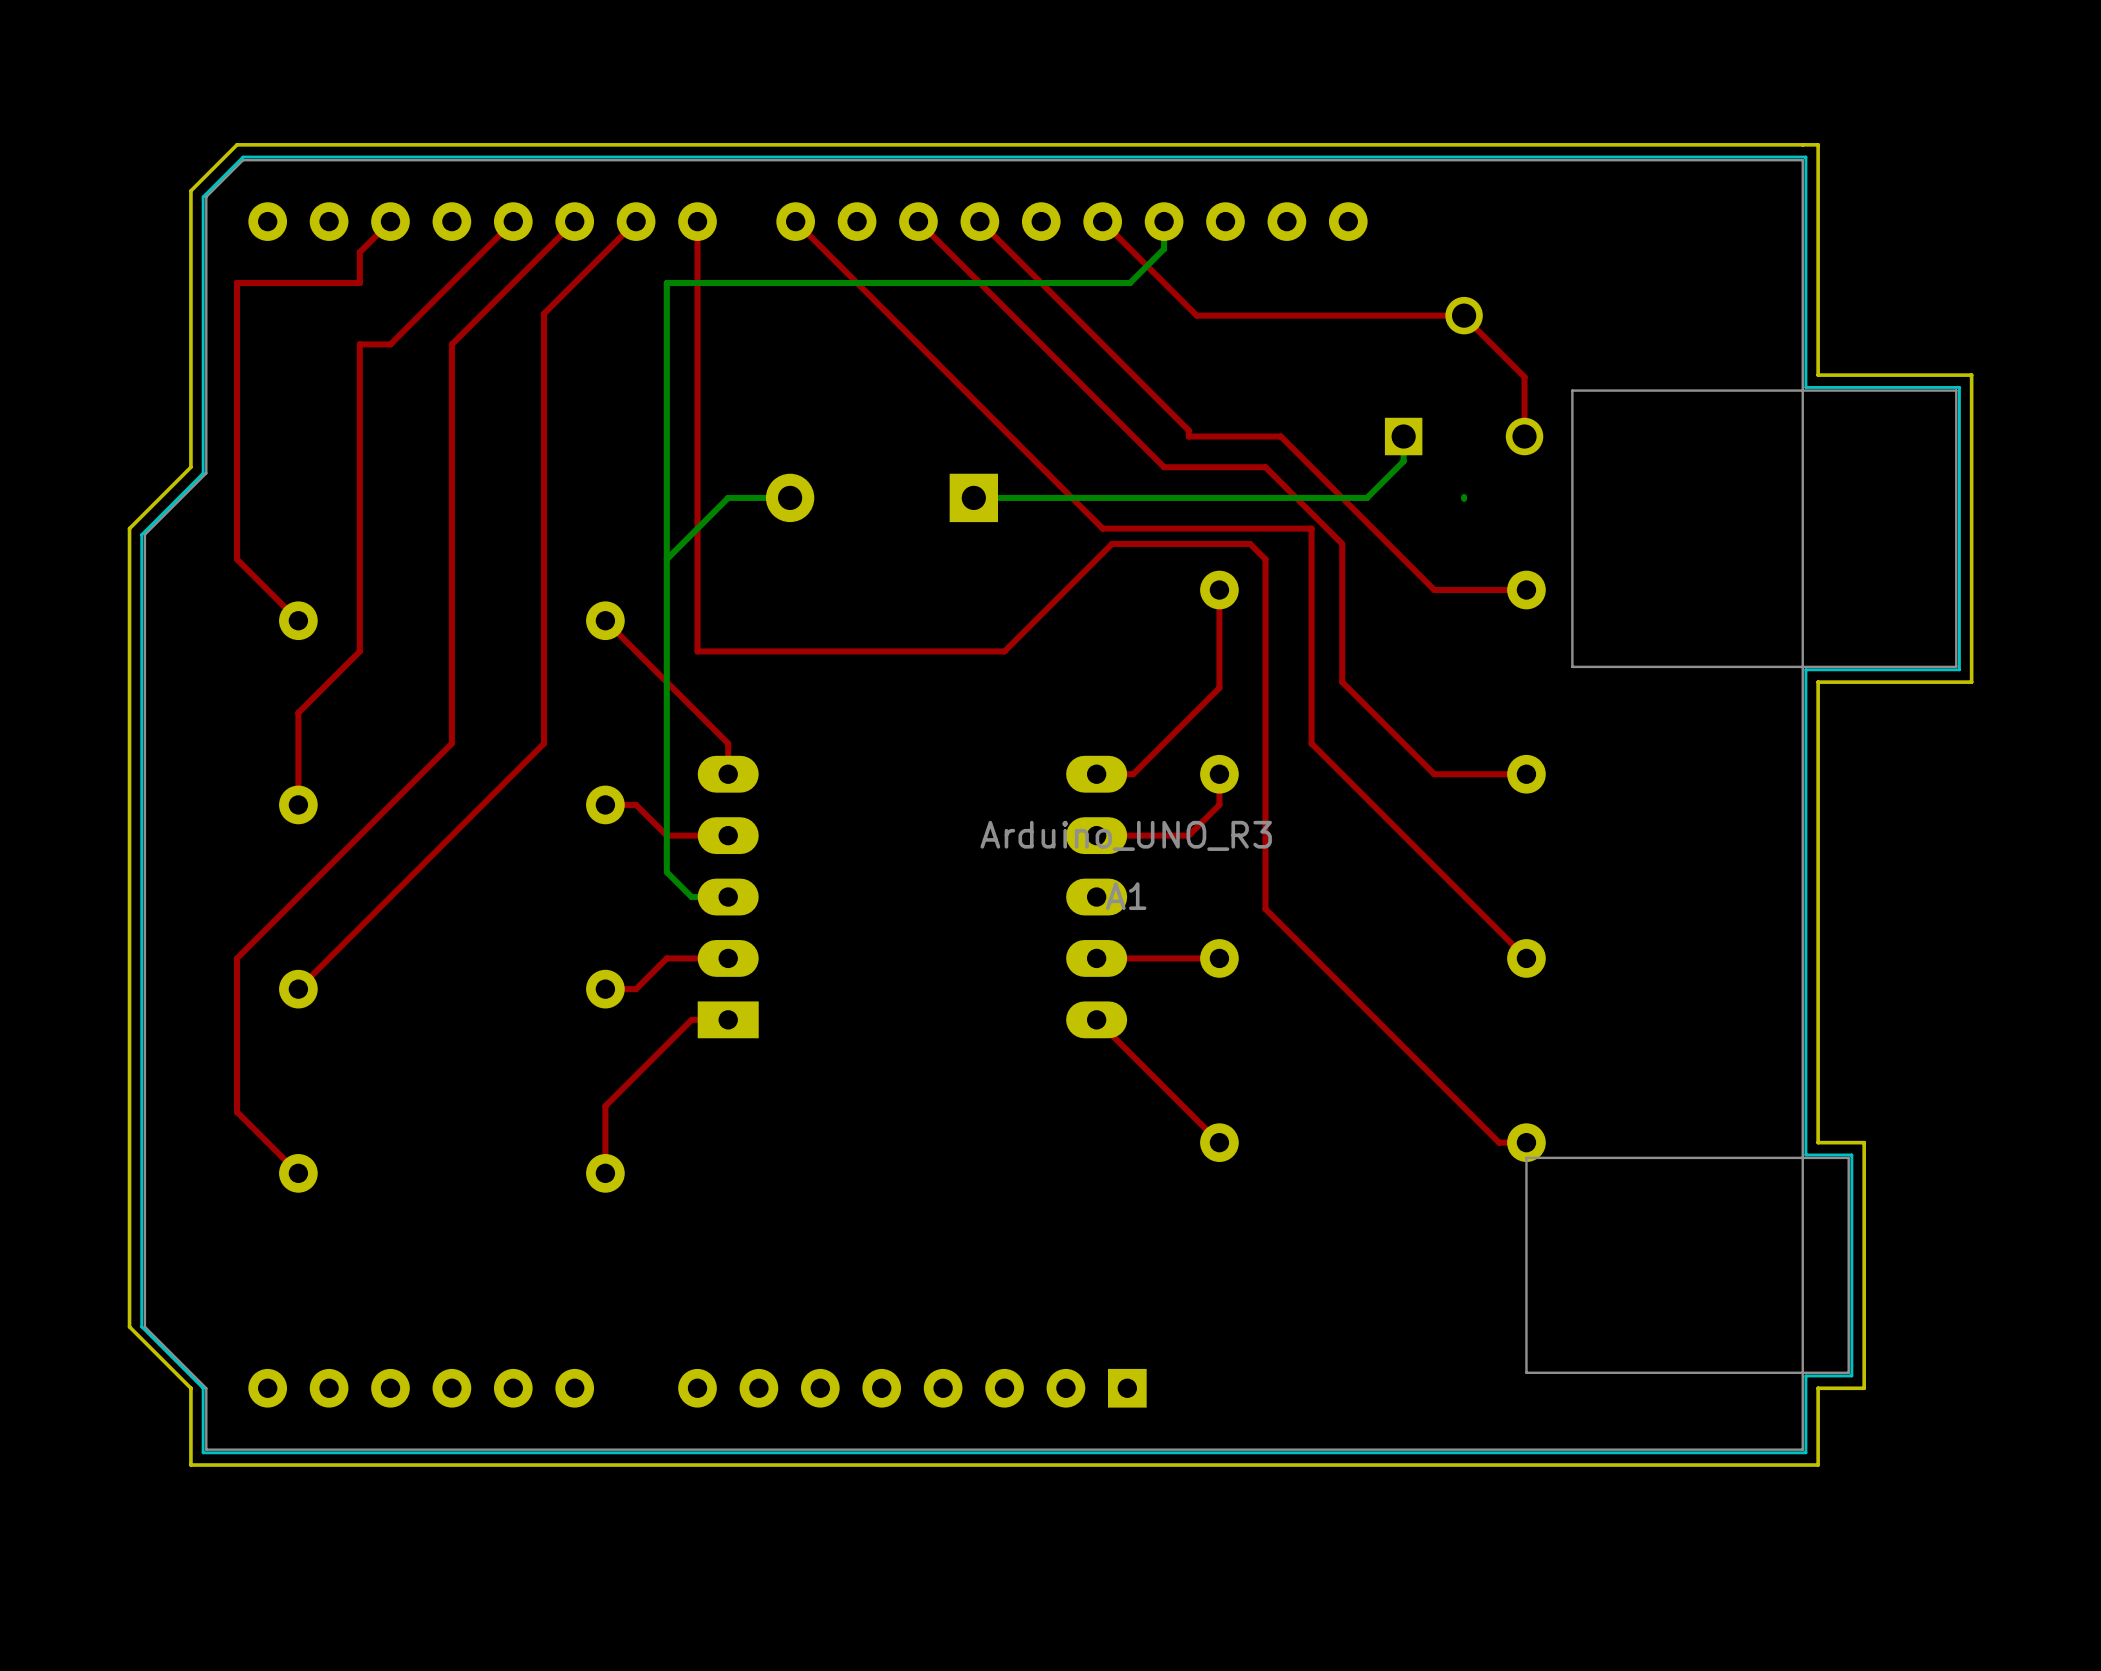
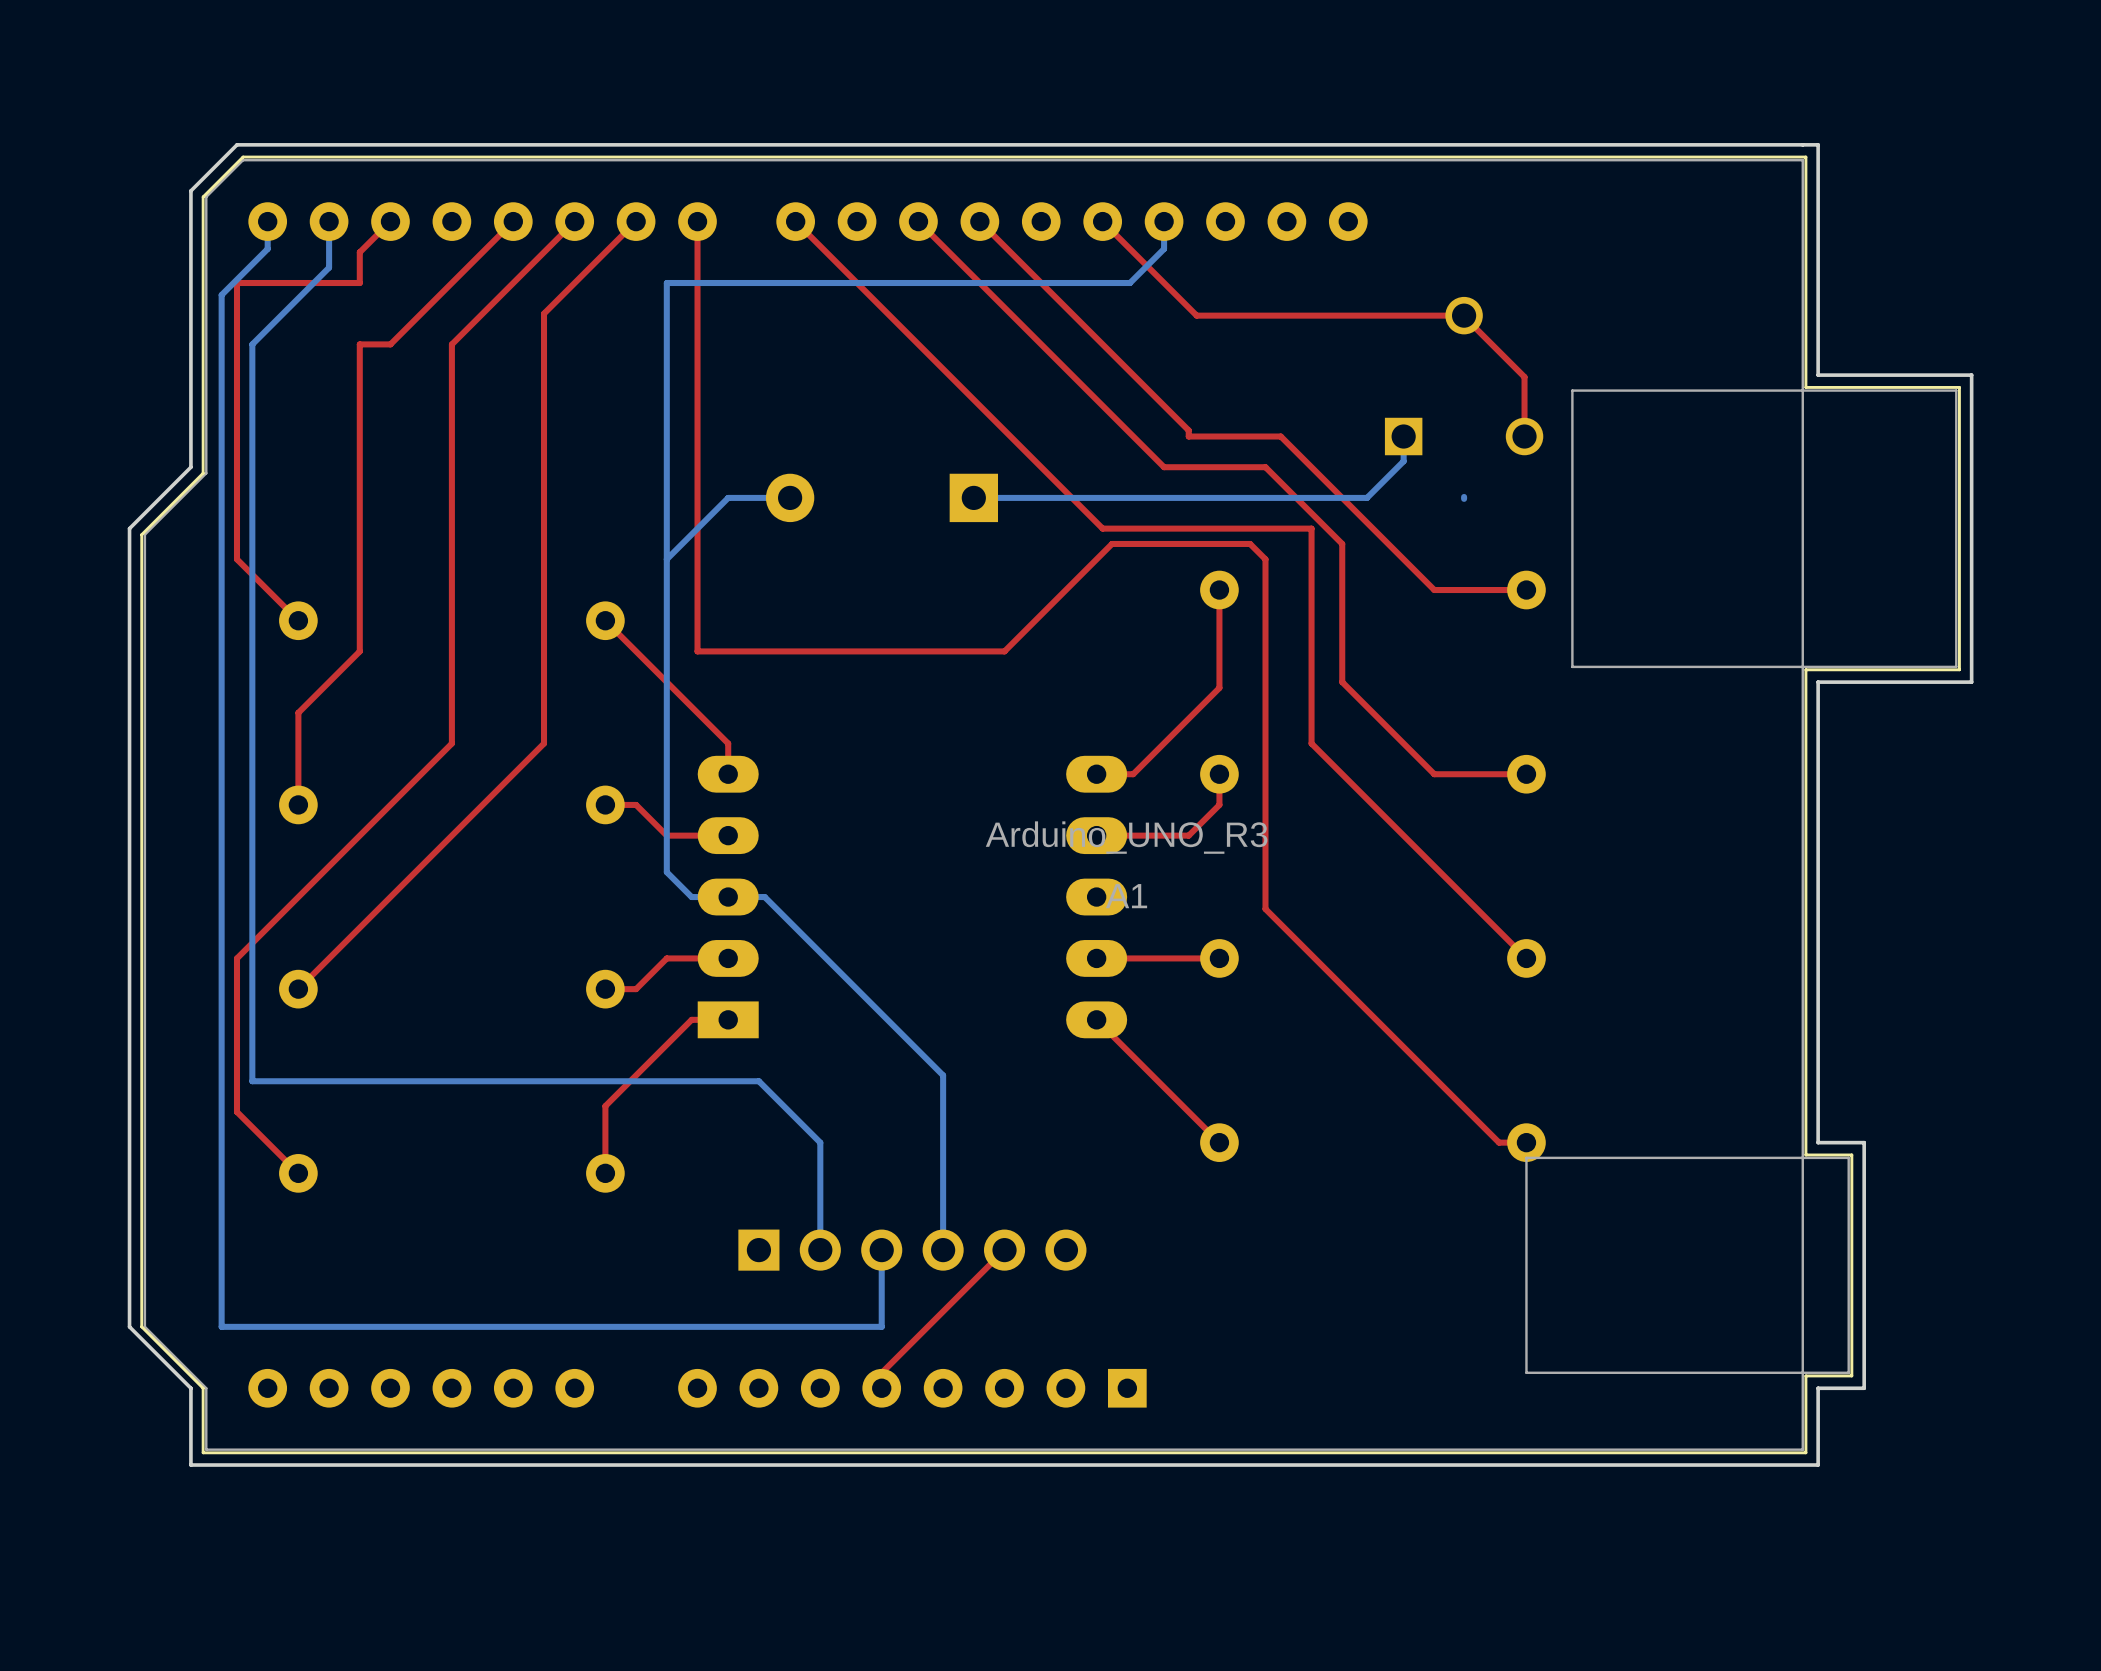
bottom track: none -> (267, 221) (267, 248) (221, 295) (221, 1326) (881, 1326) (881, 1250)
bottom track: none -> (329, 221) (329, 267) (252, 344) (252, 1081) (758, 1081) (820, 1142) (820, 1250)
bottom track: none -> (728, 897) (764, 897) (943, 1075) (943, 1250)
part: none -> (912, 1250)
top track: none -> (1004, 1250) (881, 1372) (881, 1388)

